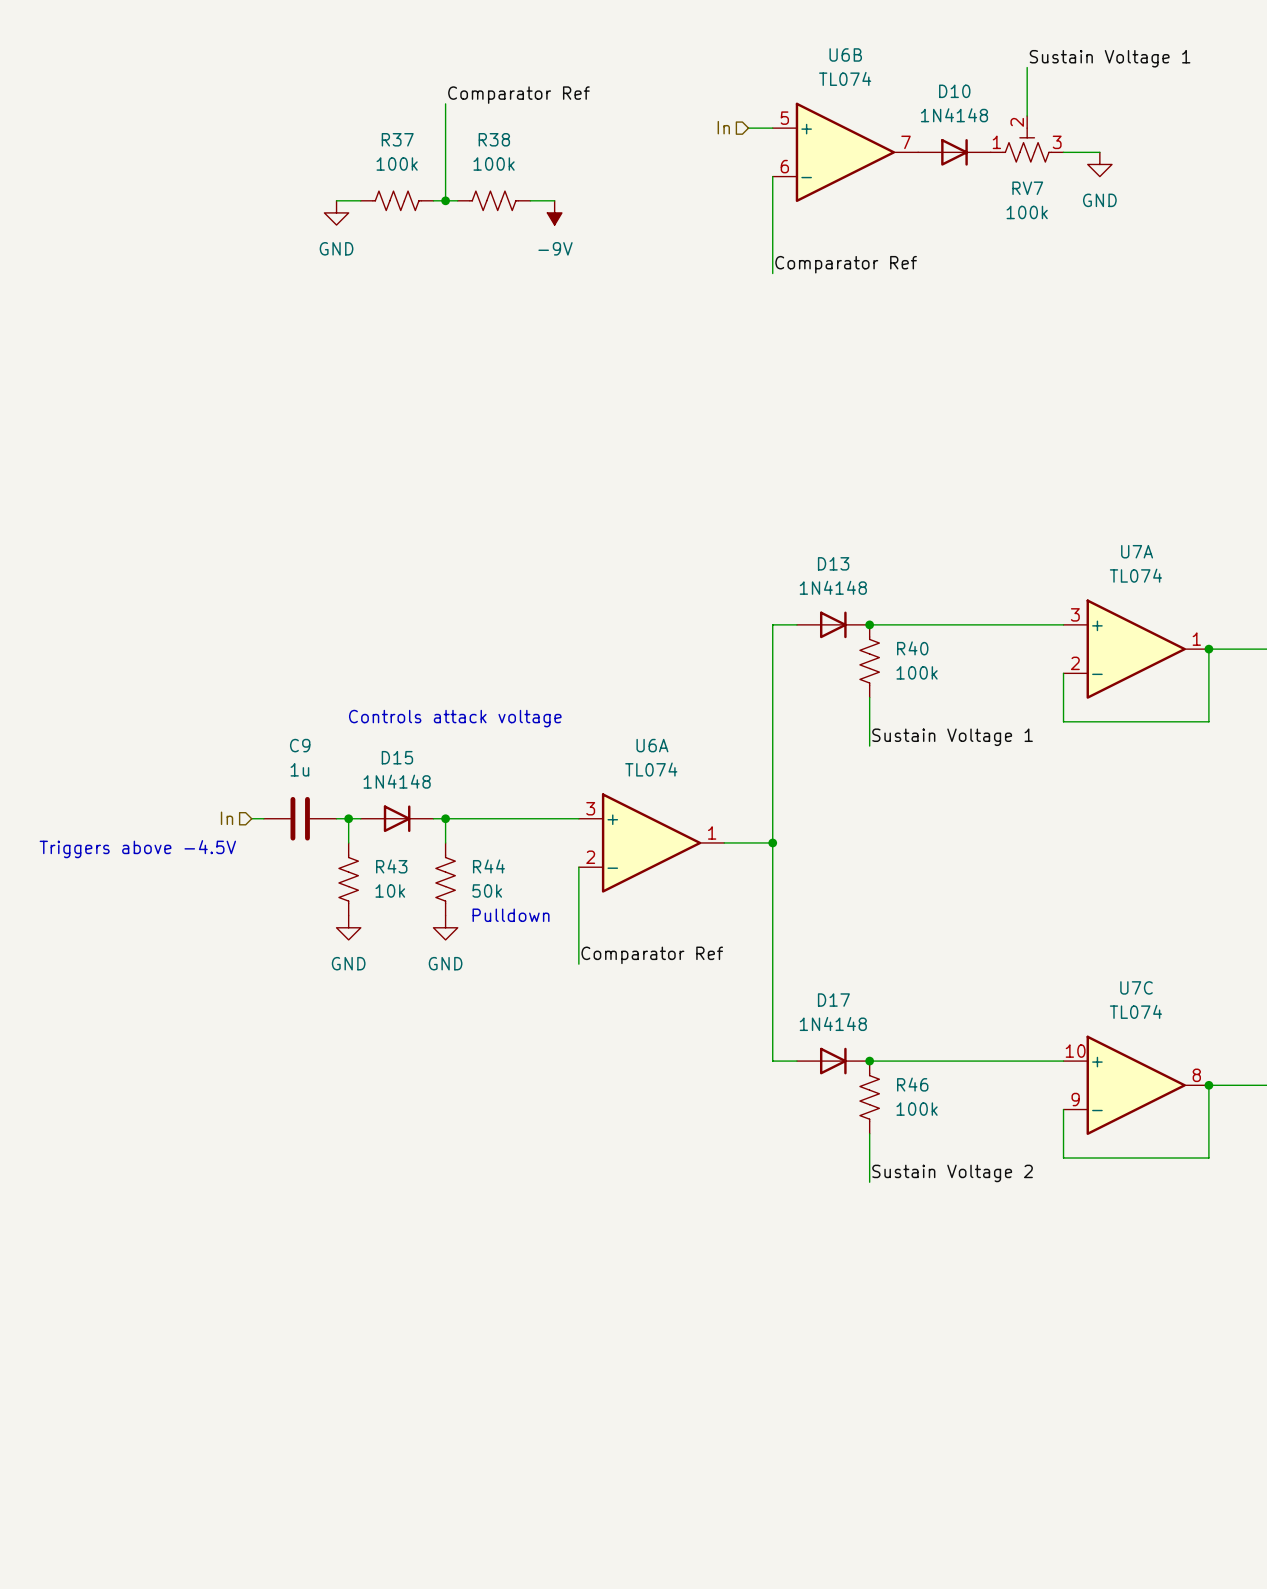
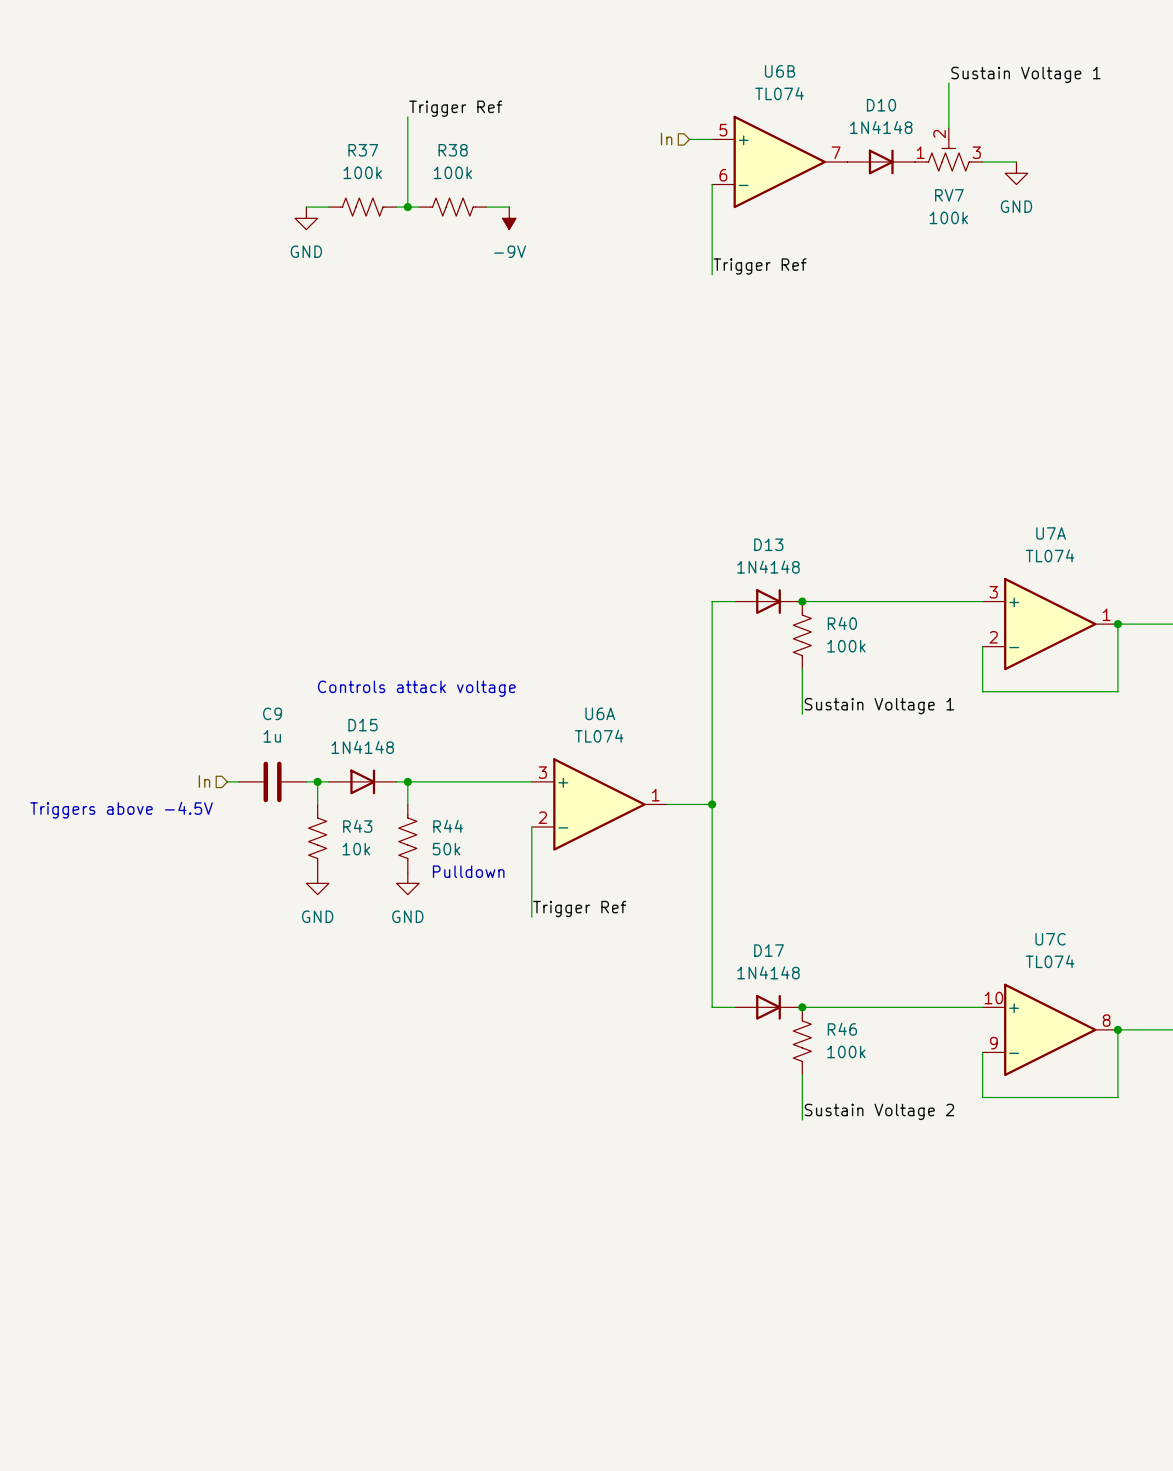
label: Comparator Ref (518, 95) -> Trigger Ref (455, 108)
label: Comparator Ref (846, 264) -> Trigger Ref (759, 266)
label: Comparator Ref (652, 955) -> Trigger Ref (579, 908)

